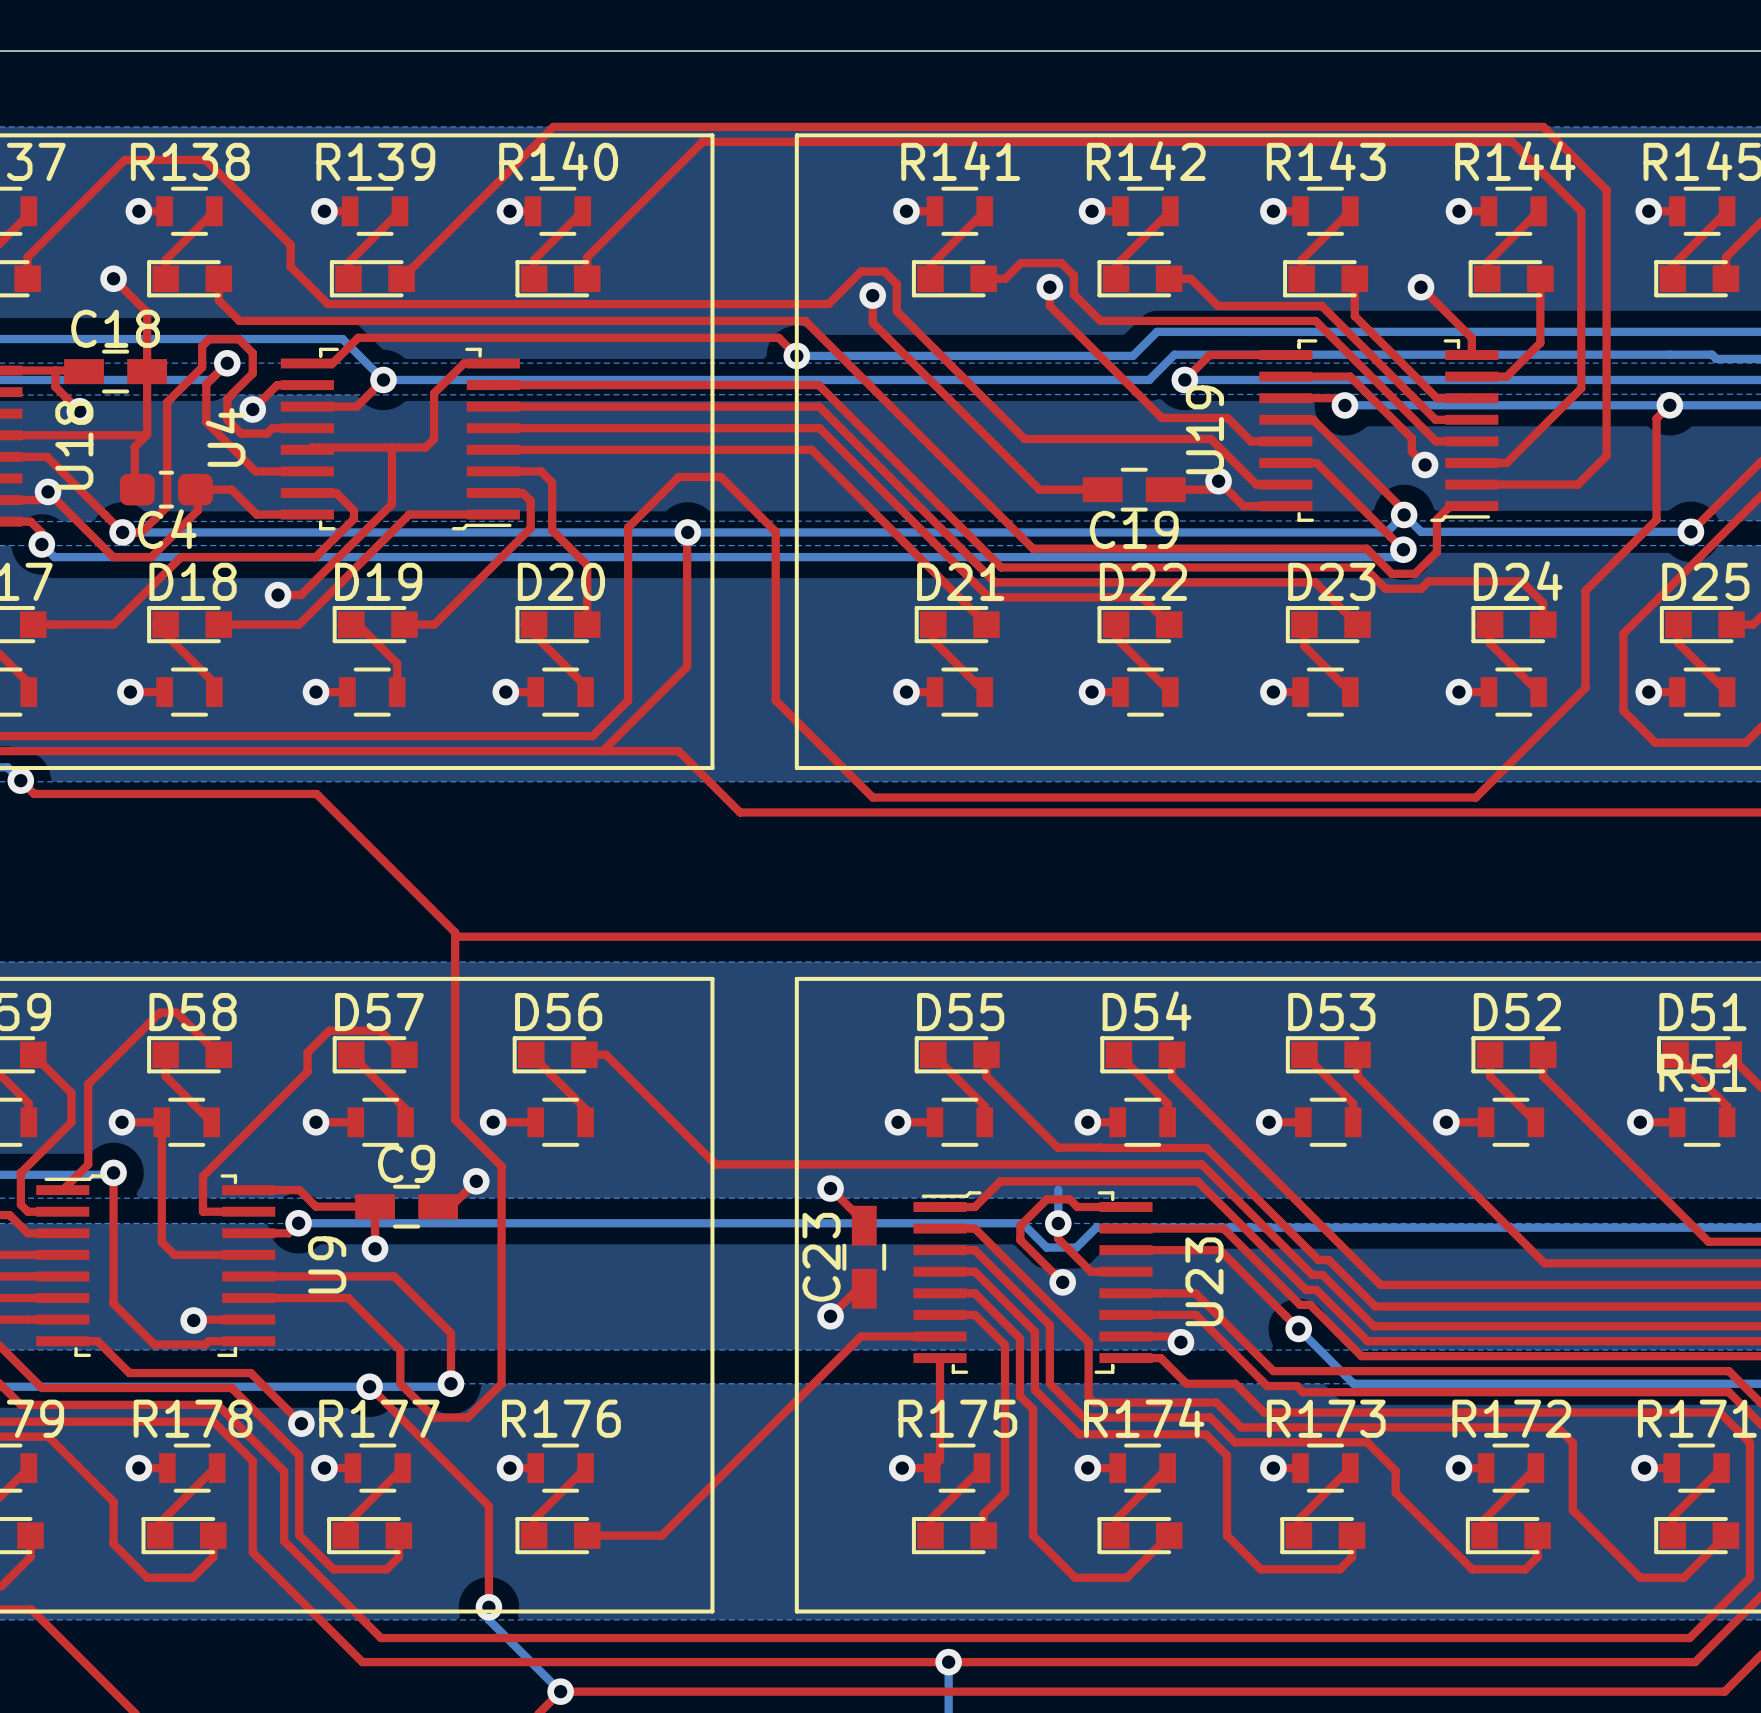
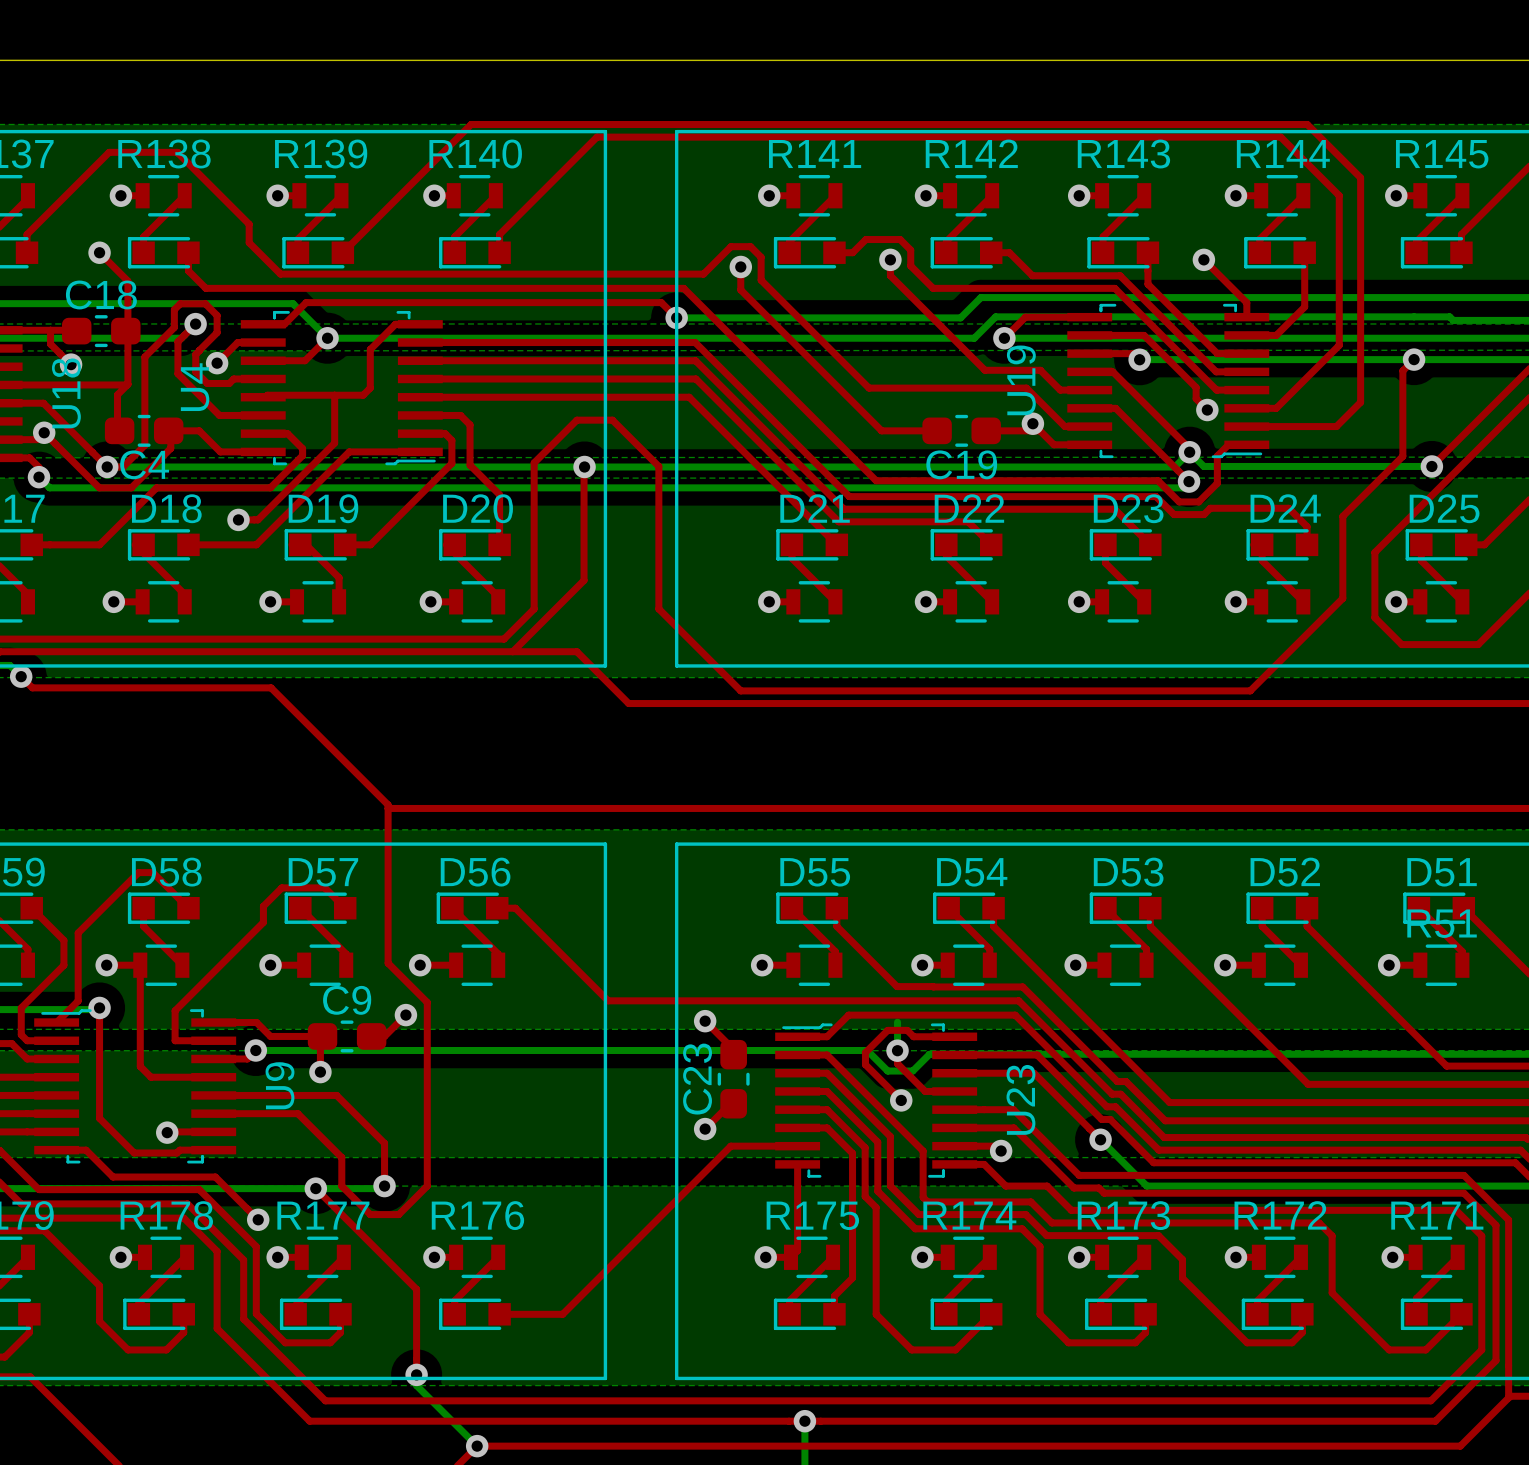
C18 footprint: [64, 349, 168, 394] -> [62, 315, 141, 348]
C19 footprint: [1082, 467, 1186, 512] -> [922, 414, 1001, 447]
C9 footprint: [355, 1184, 459, 1229] -> [307, 1020, 387, 1053]
C23 footprint: [842, 1205, 887, 1309] -> [717, 1039, 750, 1119]

